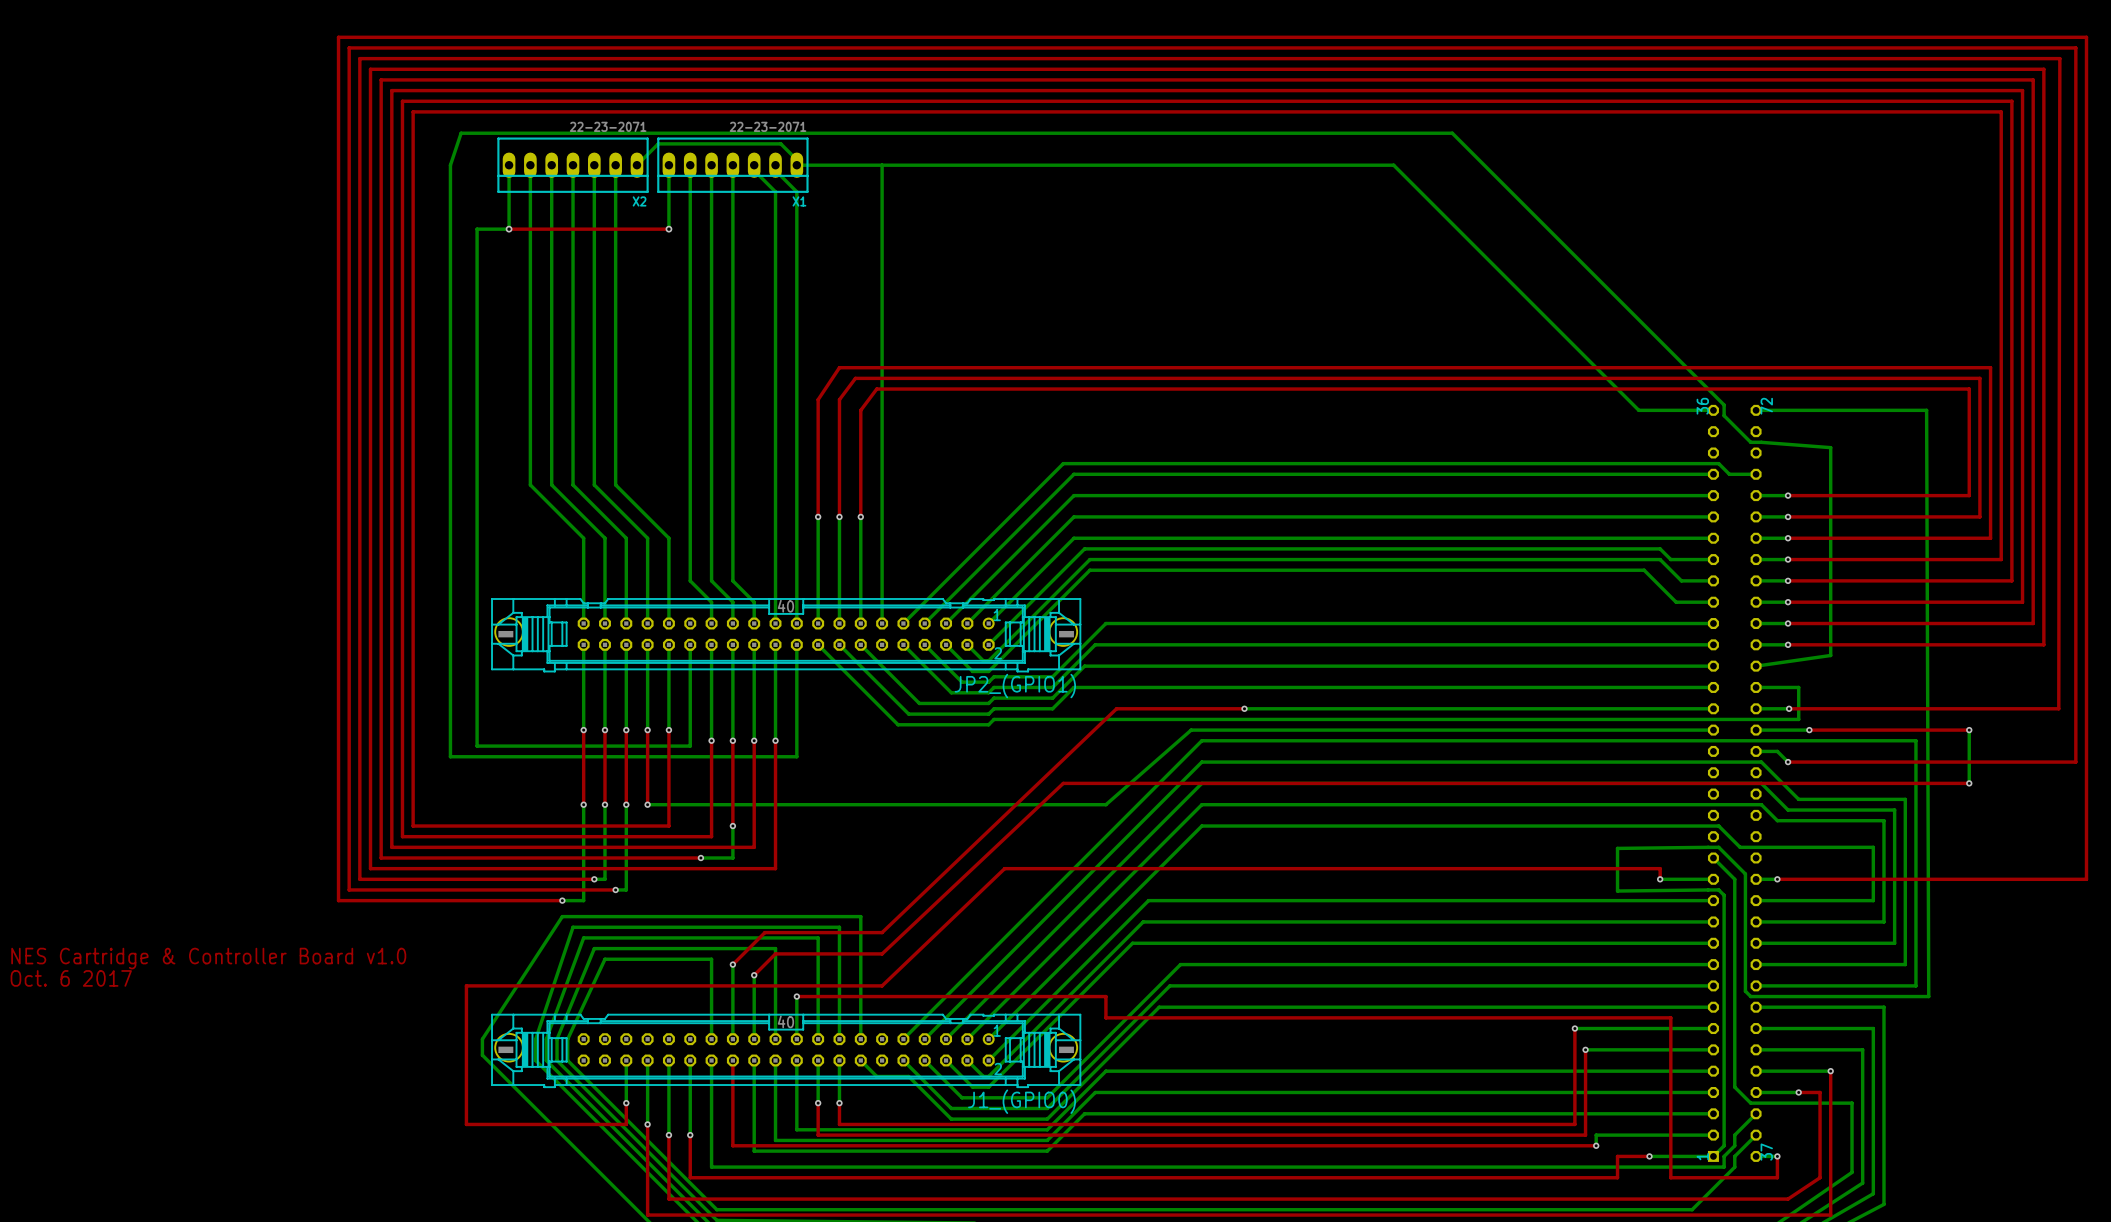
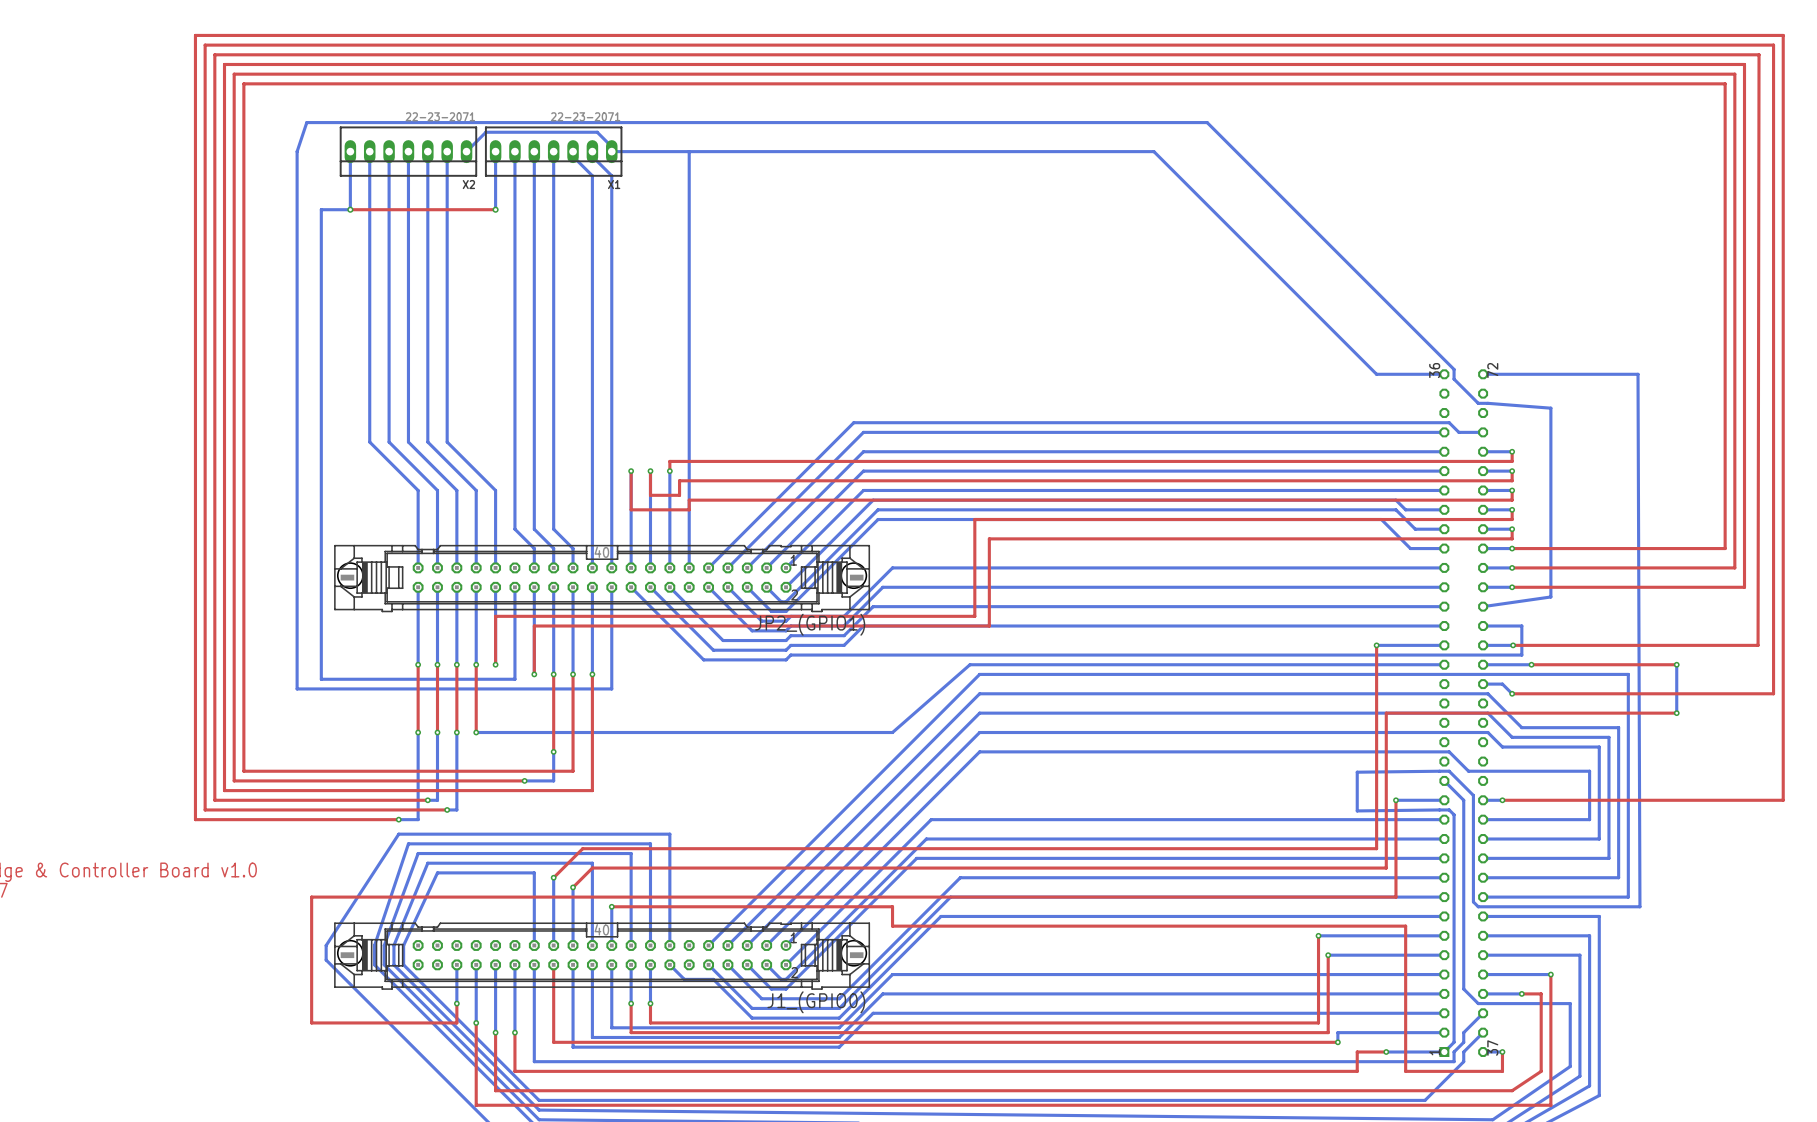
top track: (1788, 495) (1969, 495) (1969, 389) (876, 389) (860, 410) (860, 506) -> (1512, 451) (1512, 461) (669, 461)
top track: (818, 516) (818, 399) (839, 367) (1990, 367) (1990, 538) (1788, 538) -> (631, 471) (631, 509) (689, 509) (689, 500) (1512, 500) (1512, 490)
top track: (839, 516) (839, 399) (855, 378) (1979, 378) (1979, 516) (1788, 516) -> (650, 471) (650, 495) (679, 495) (679, 480) (1512, 480) (1512, 471)
top track: (1788, 559) (2001, 559) (2001, 111) (413, 111) (413, 826) (668, 826) (668, 730) -> (1512, 509) (1512, 519) (974, 519) (974, 616) (495, 616) (495, 664)
top track: (1788, 580) (2011, 580) (2011, 101) (402, 101) (402, 836) (711, 836) (711, 740) -> (1512, 529) (1512, 538) (989, 538) (989, 626) (534, 626) (534, 674)
bottom track: (1244, 708) (1638, 708) -> none
top track: (1244, 708) (1116, 708) (882, 932) -> (1376, 645) (1376, 848) (689, 848)
via: (1244, 708) -> none
via: none -> (1376, 645)
top track: (1649, 783) (1063, 783) (882, 953) -> (1386, 713) (1386, 868) (689, 868)
top track: (1660, 879) (1660, 868) (1004, 868) (882, 985) -> (1395, 800) (1395, 897) (689, 897)

